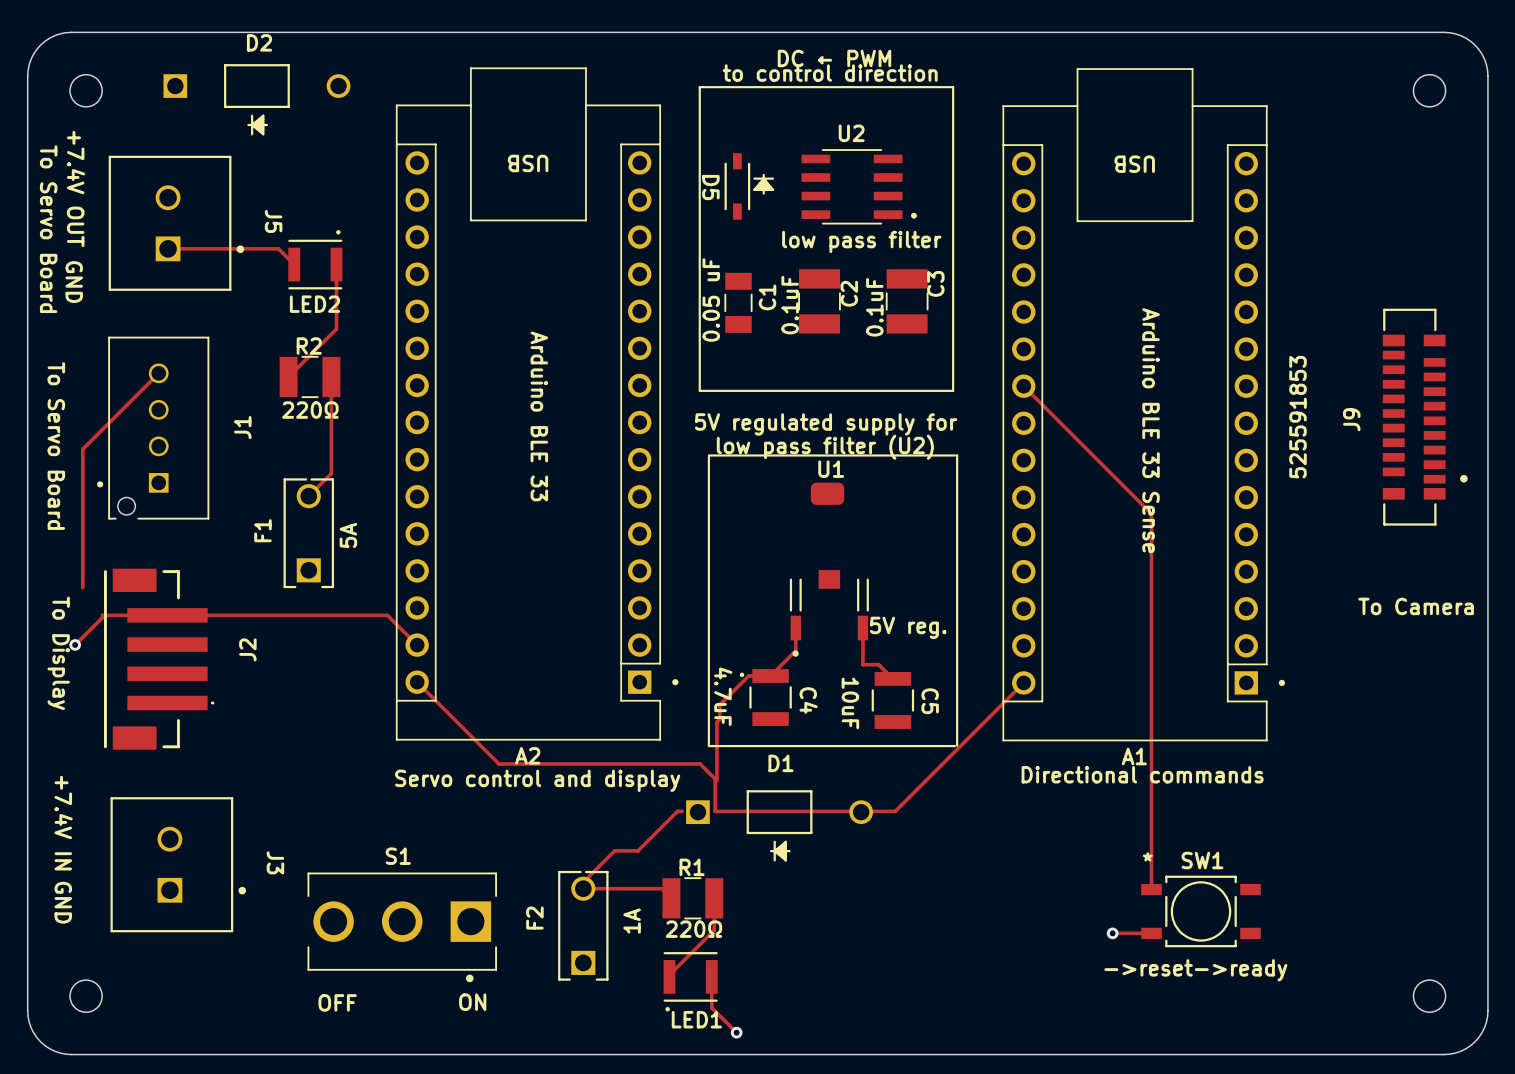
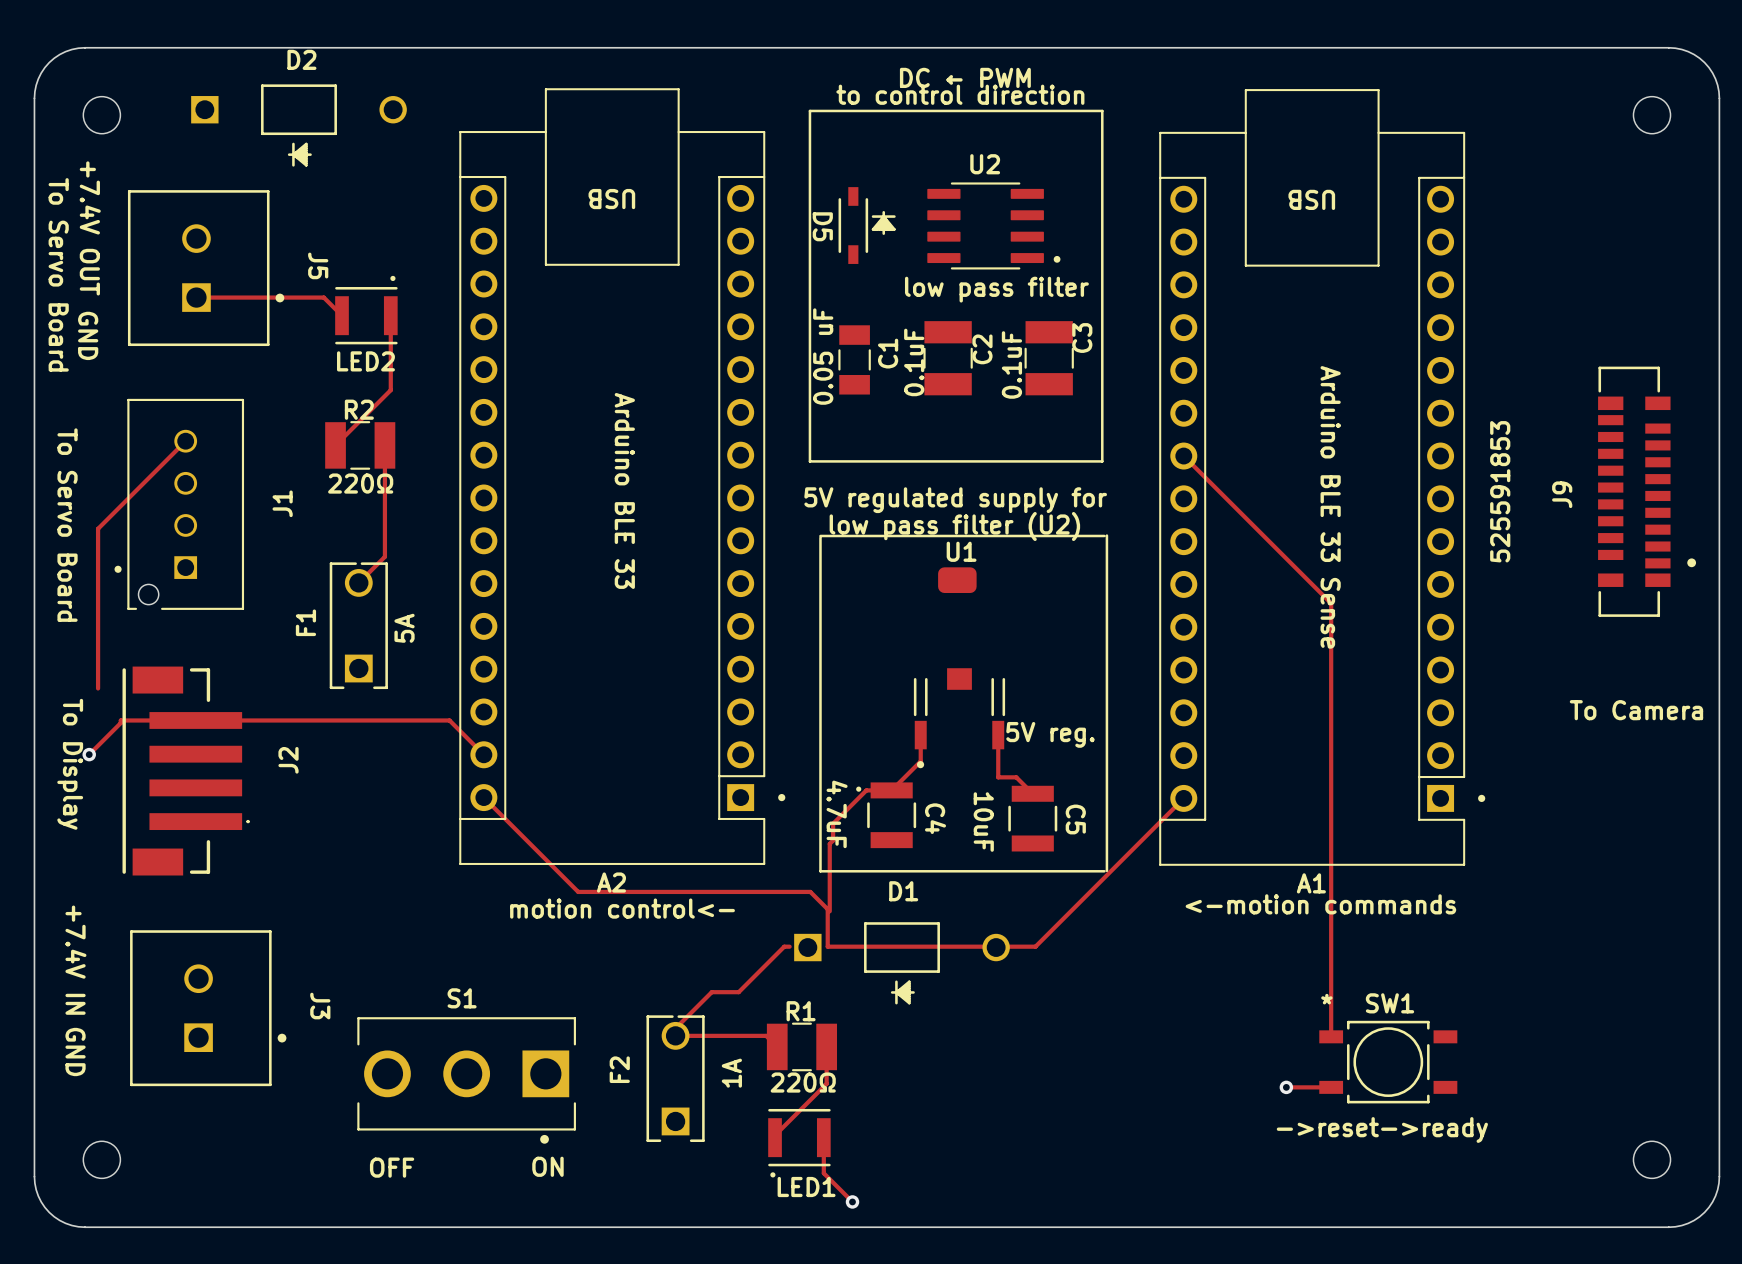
A1 text: Directional commands (1142, 774) -> <-motion commands (1320, 904)
A2 text: Servo control and display (537, 780) -> motion control<- (622, 908)

